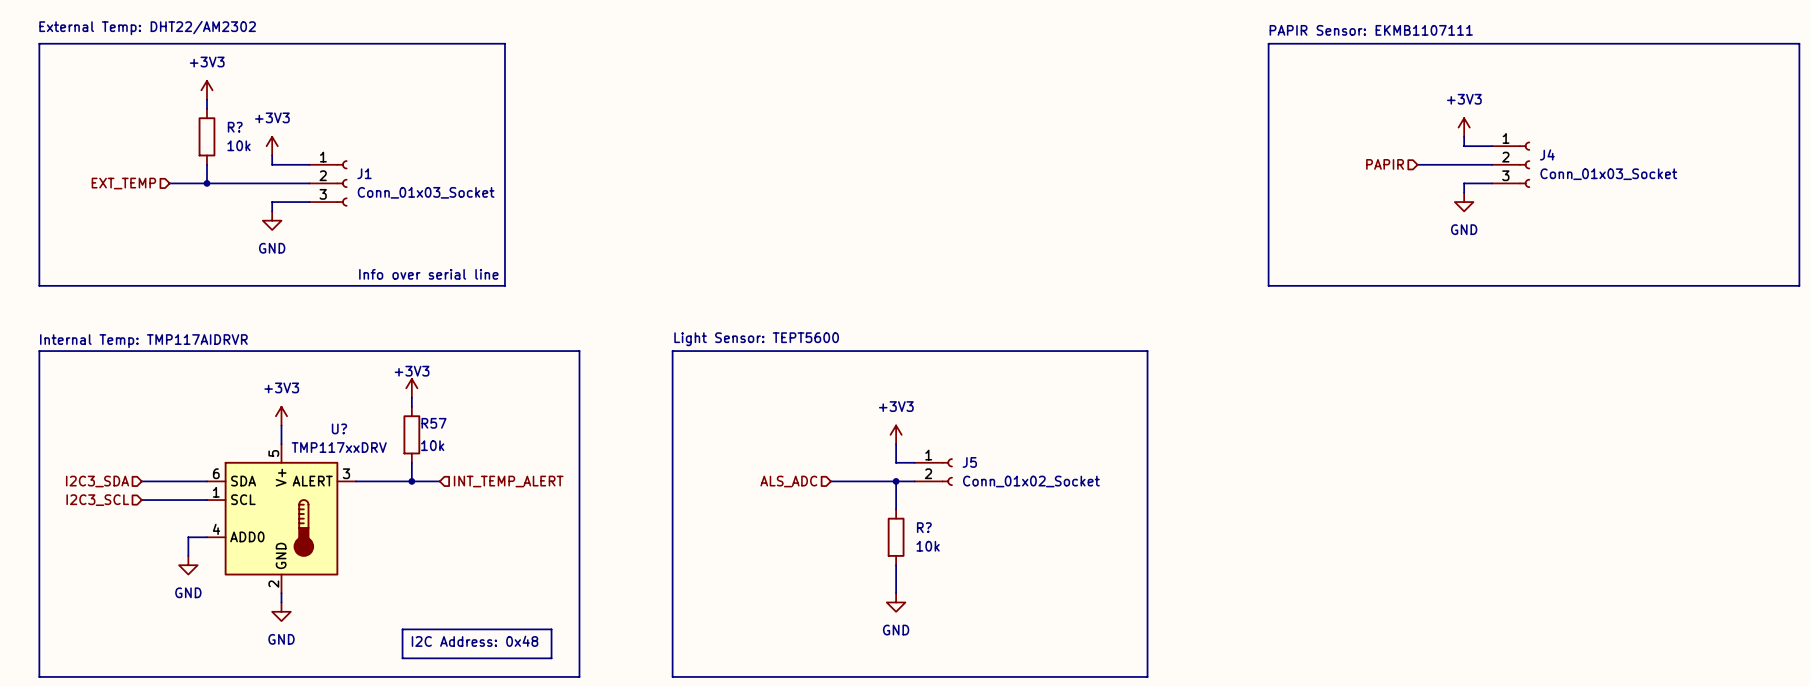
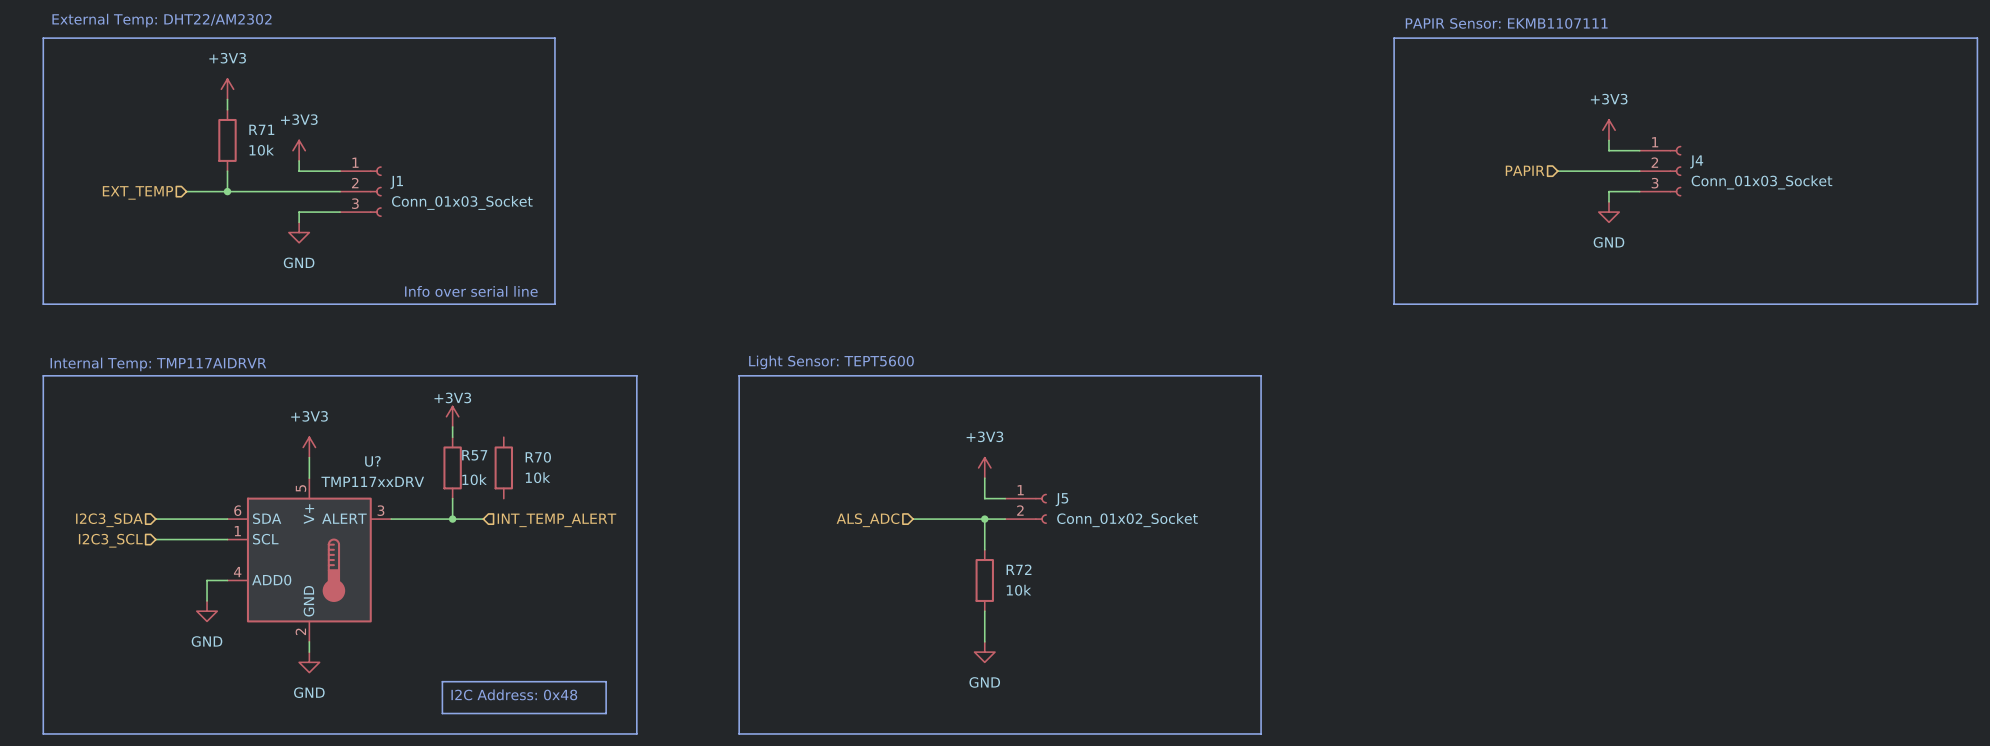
R? name: R? (235, 127) -> R71 (261, 129)
R70: none -> 10k (503, 467)
R? name: R? (924, 527) -> R72 (1019, 569)

